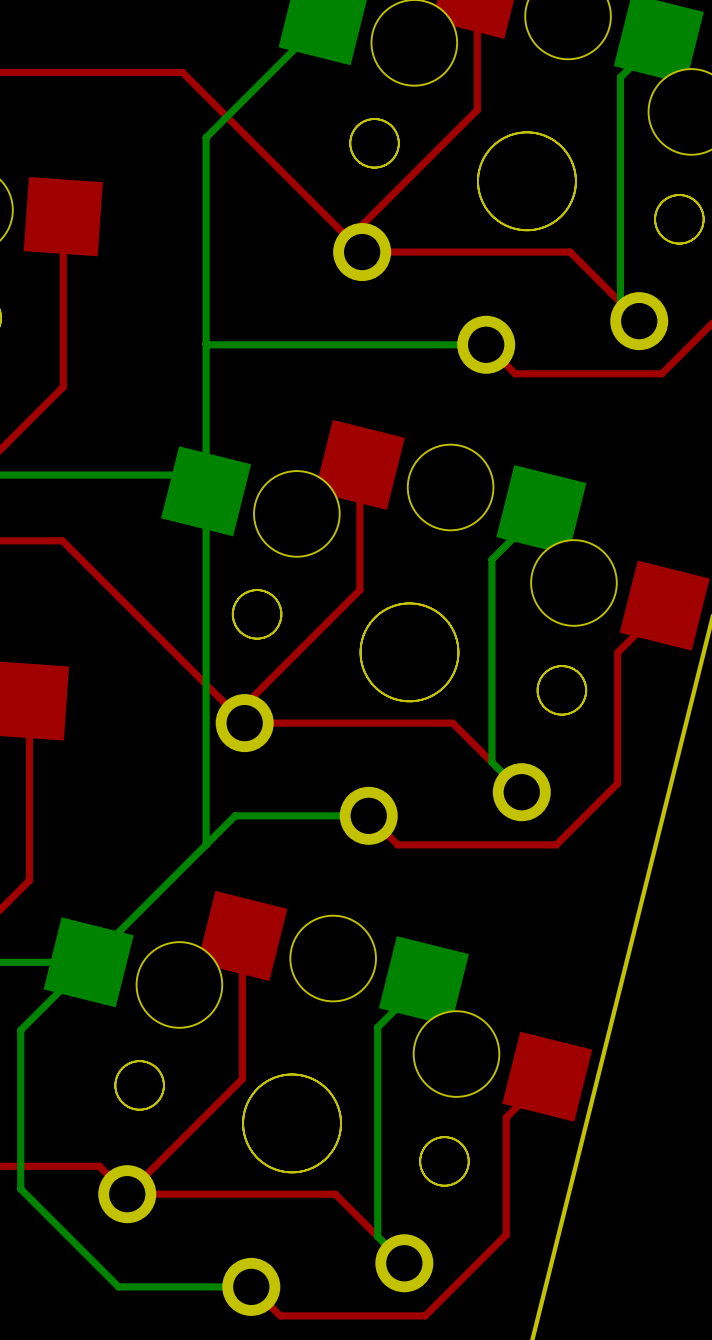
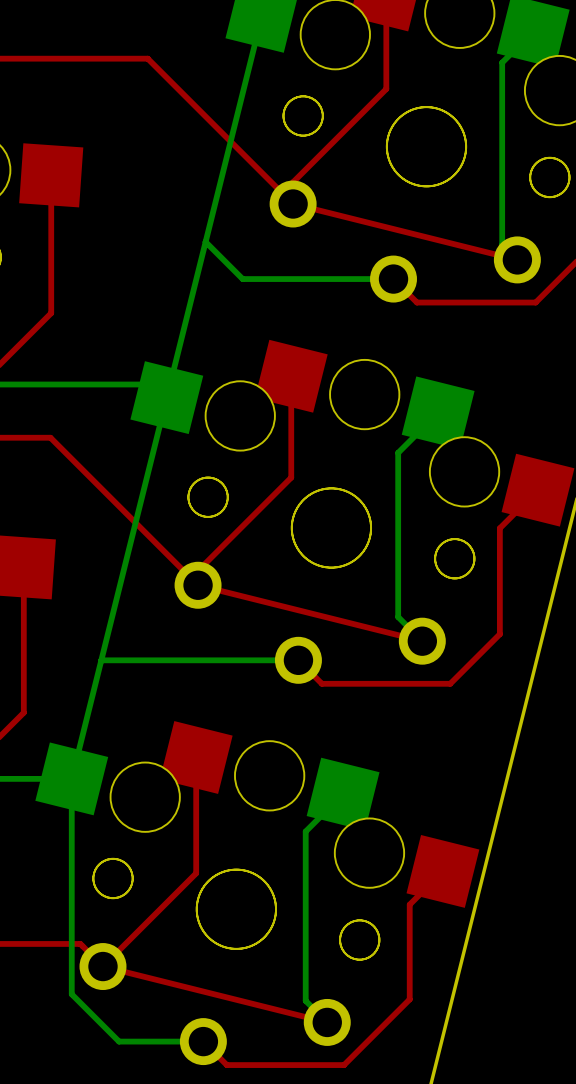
bottom track: (323, 20) (206, 137) (206, 844) -> (261, 16) (101, 660)
top track: (362, 252) (570, 252) (639, 321) -> (293, 204) (517, 259)
bottom track: (206, 344) (299, 344) -> (205, 241) (242, 279)
top track: (244, 723) (452, 723) (521, 792) -> (198, 585) (422, 641)
bottom track: (235, 815) (20, 1030) (20, 1189) (118, 1286) (147, 1286) -> (101, 660) (71, 778) (71, 994) (119, 1041)
bottom track: none -> (190, 660) (101, 660)
top track: (127, 1194) (335, 1194) (404, 1263) -> (102, 966) (327, 1022)

